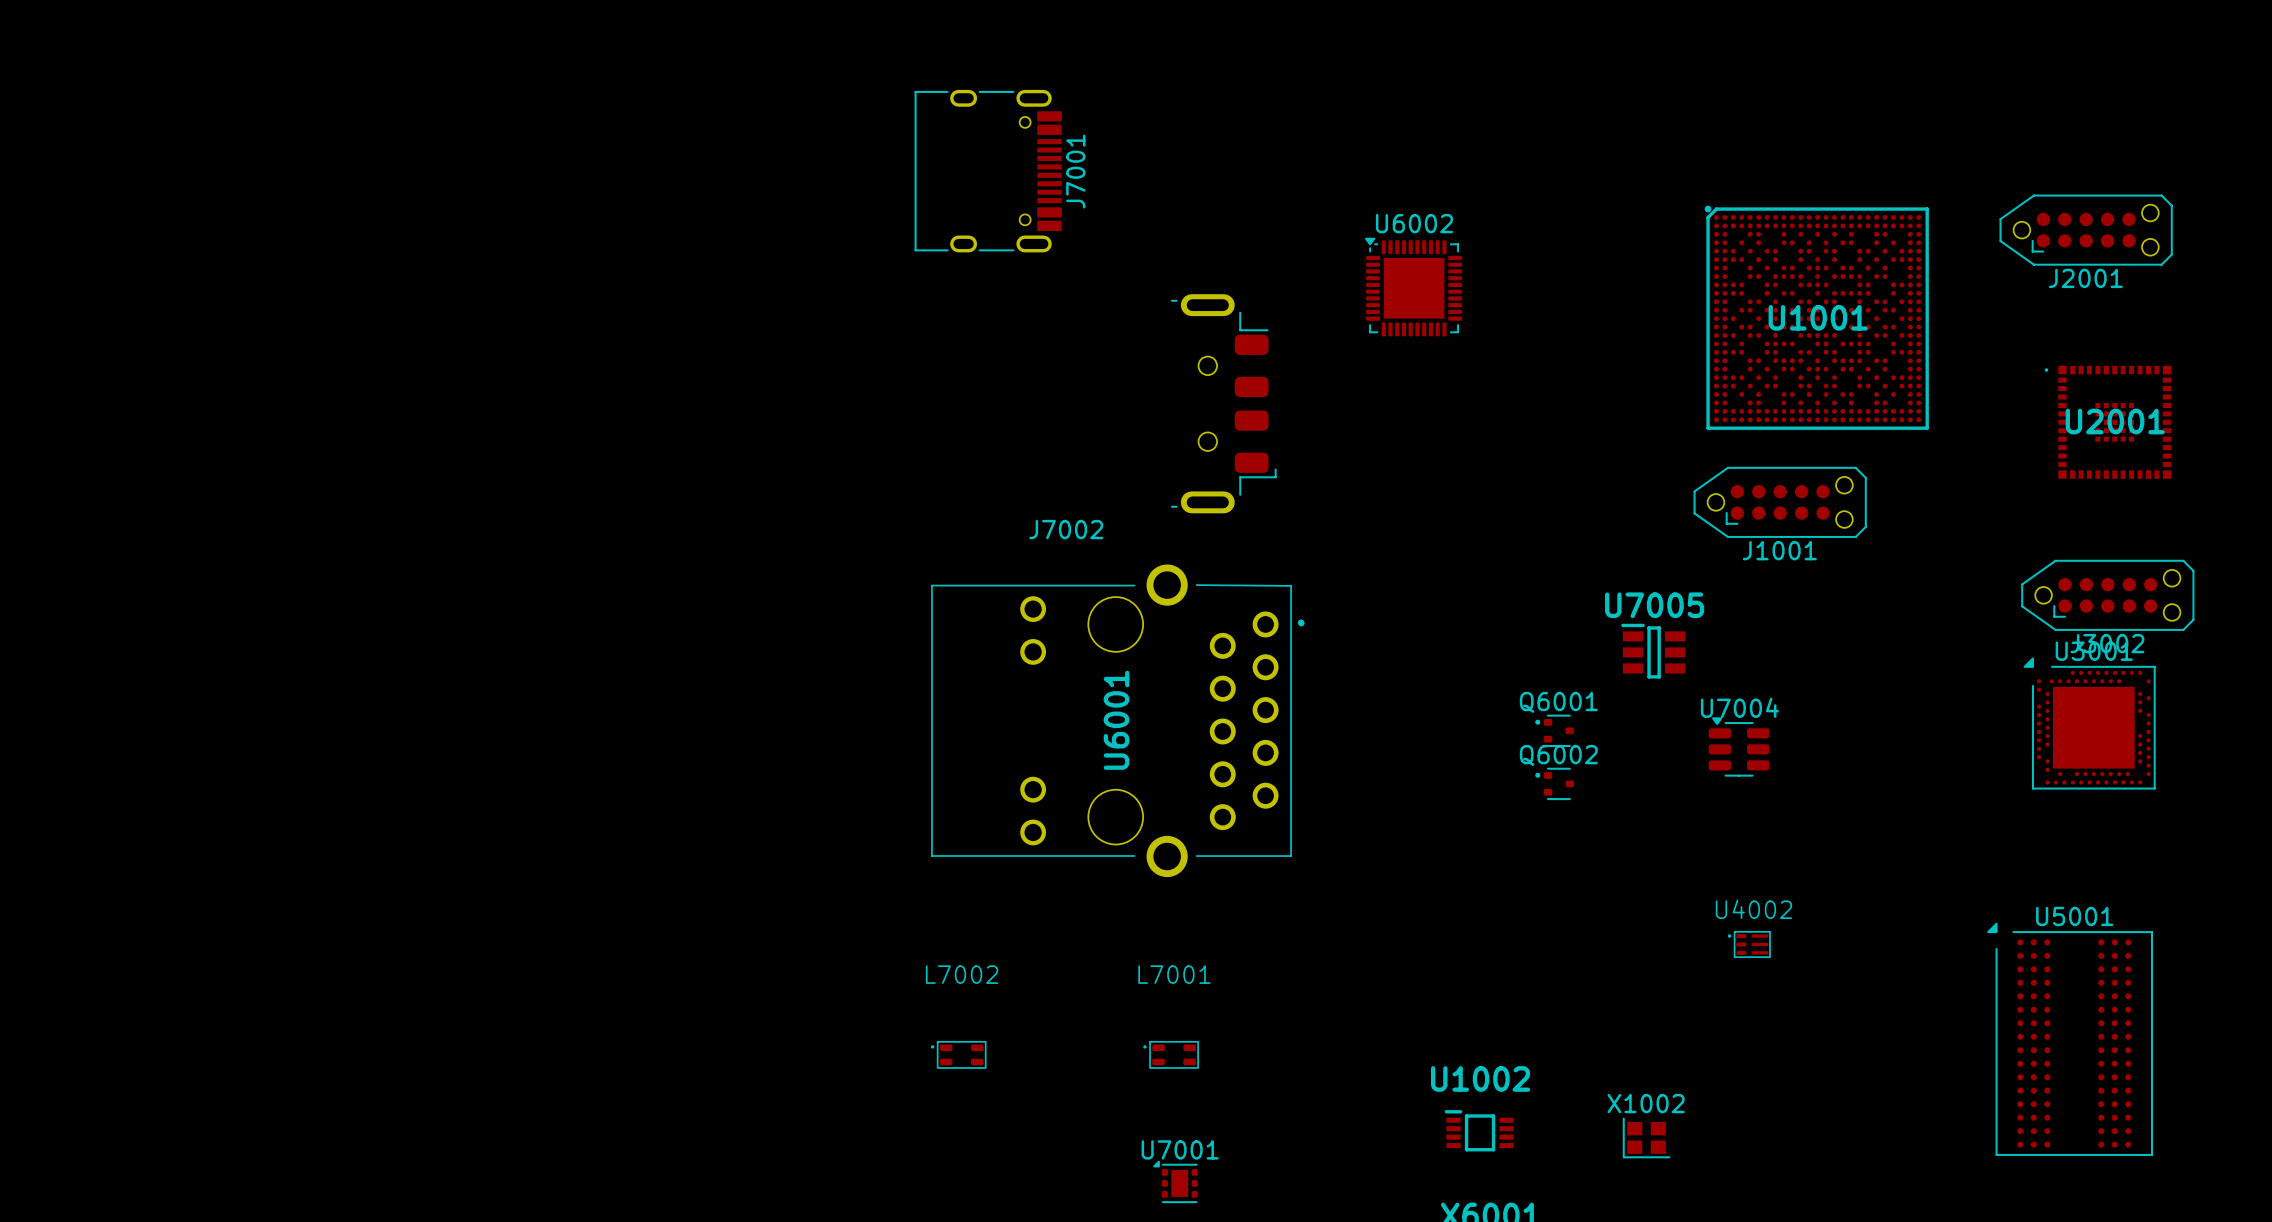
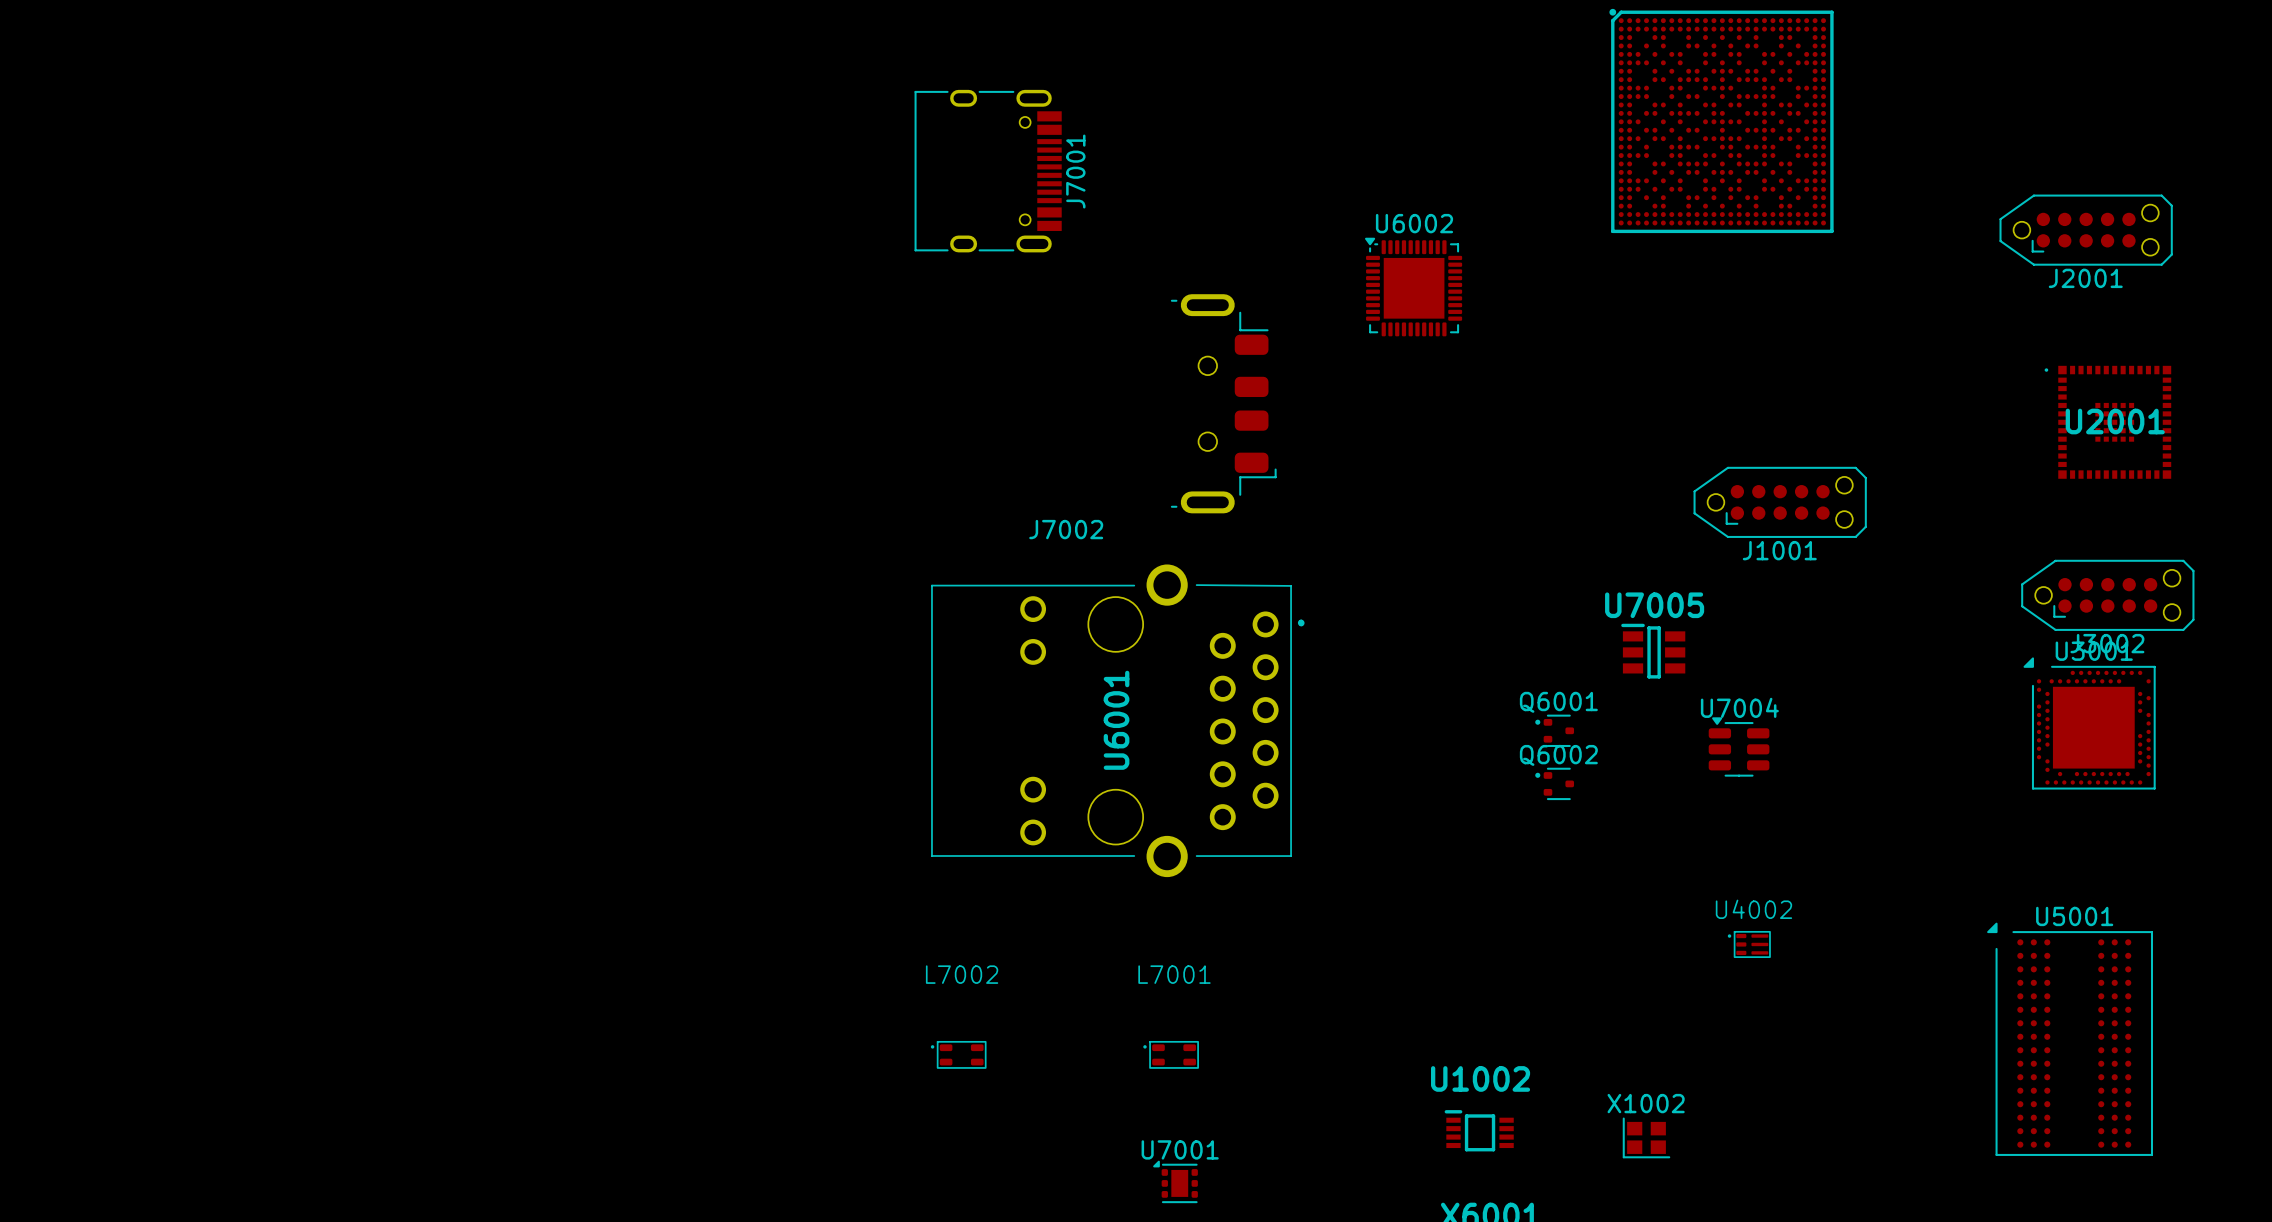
part: none -> (1721, 120)
U1001: (1816, 317) -> none

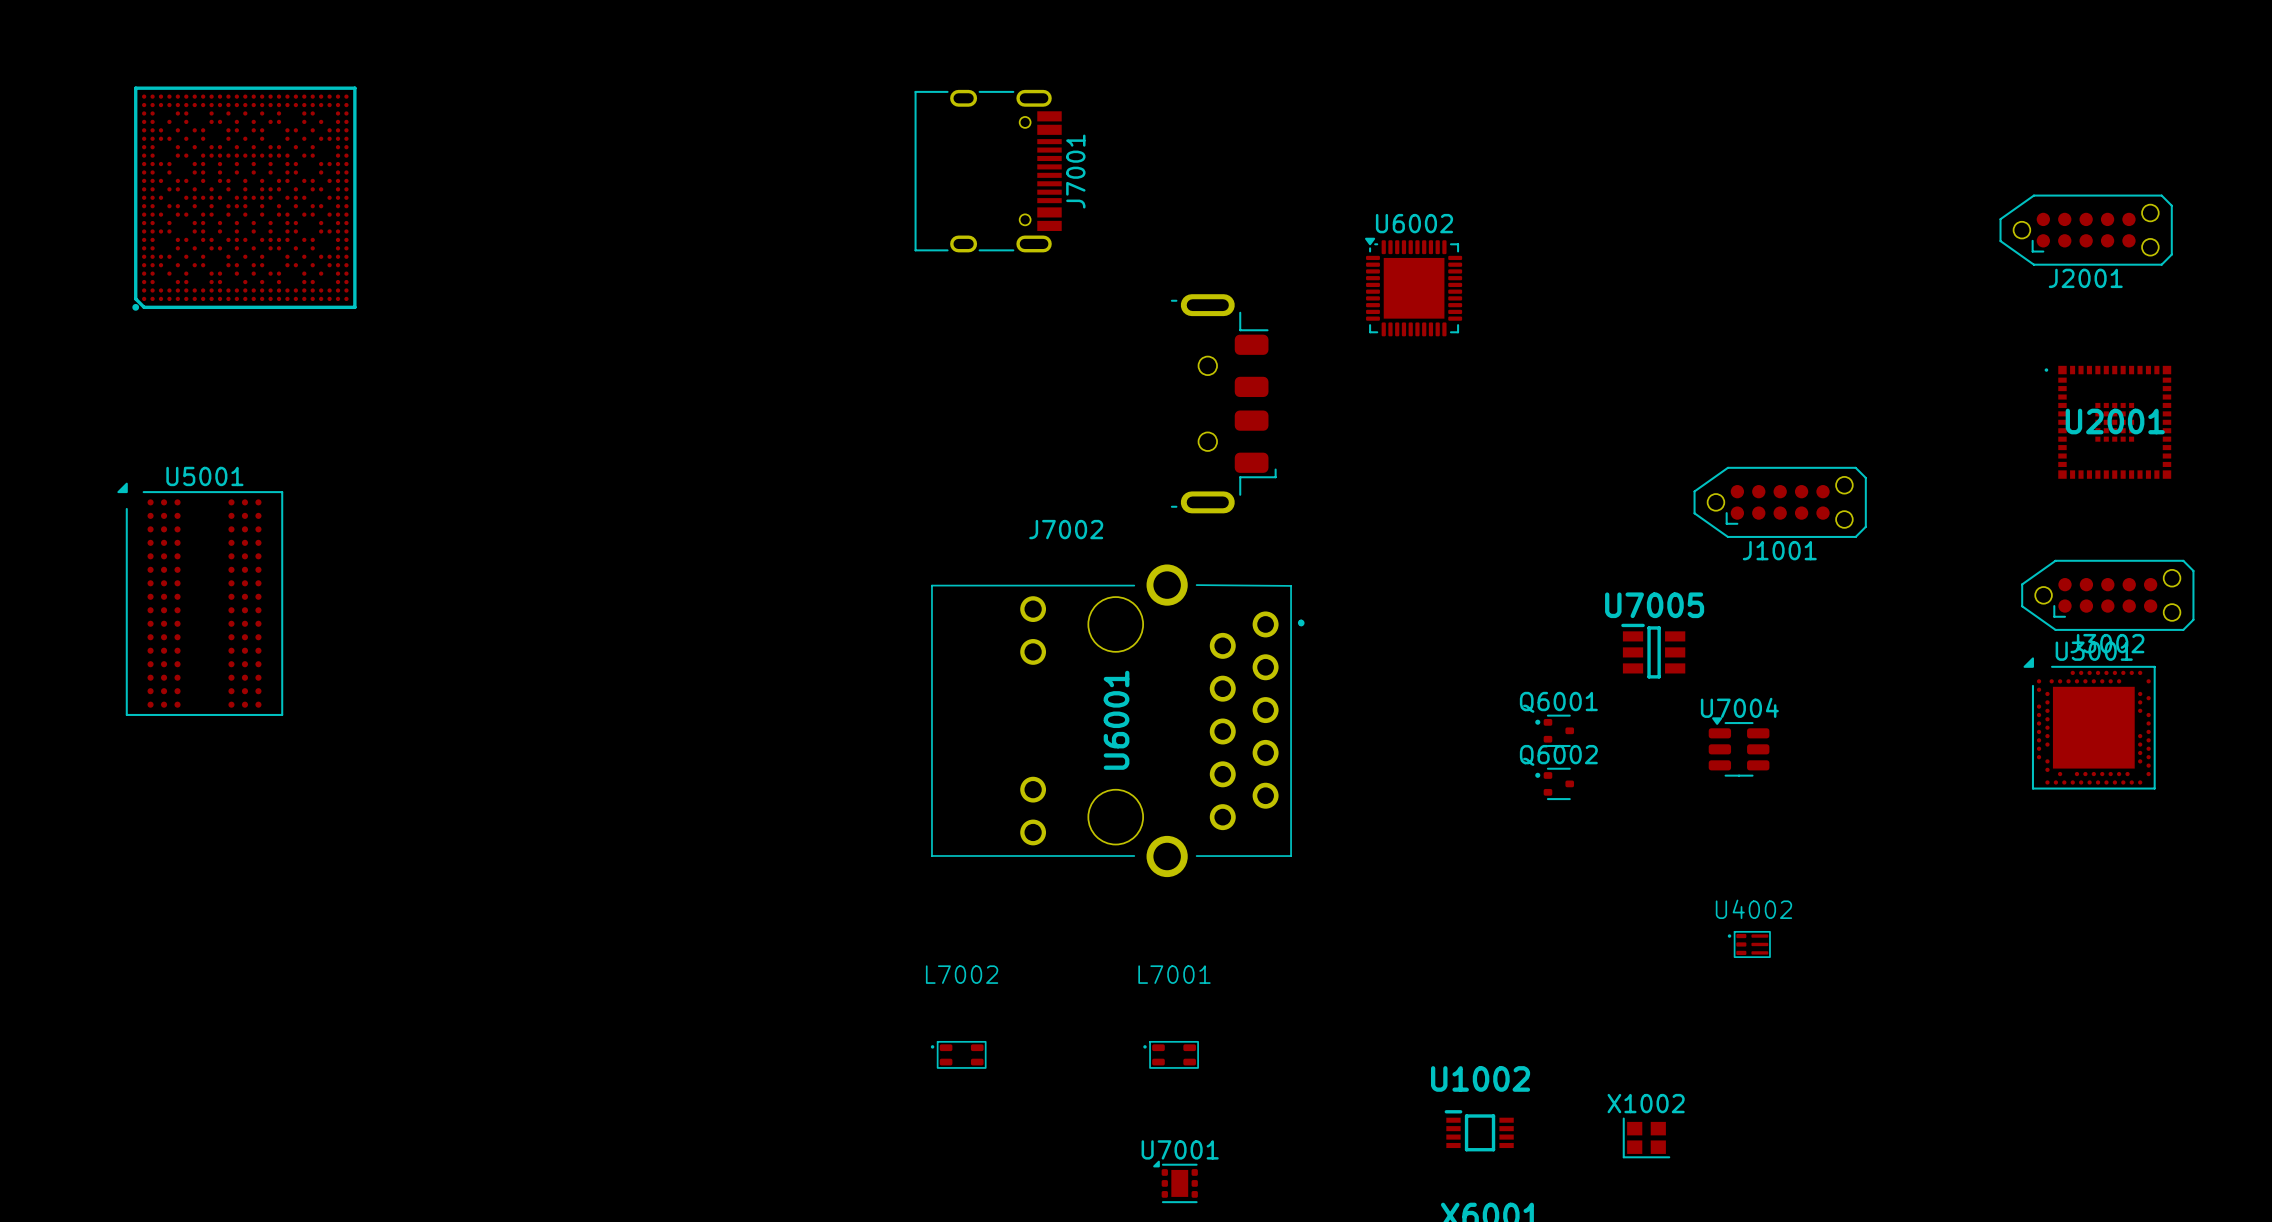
part: (1721, 120) -> none
part: none -> (244, 198)
U5001 position: (2070, 1039) -> (200, 599)

